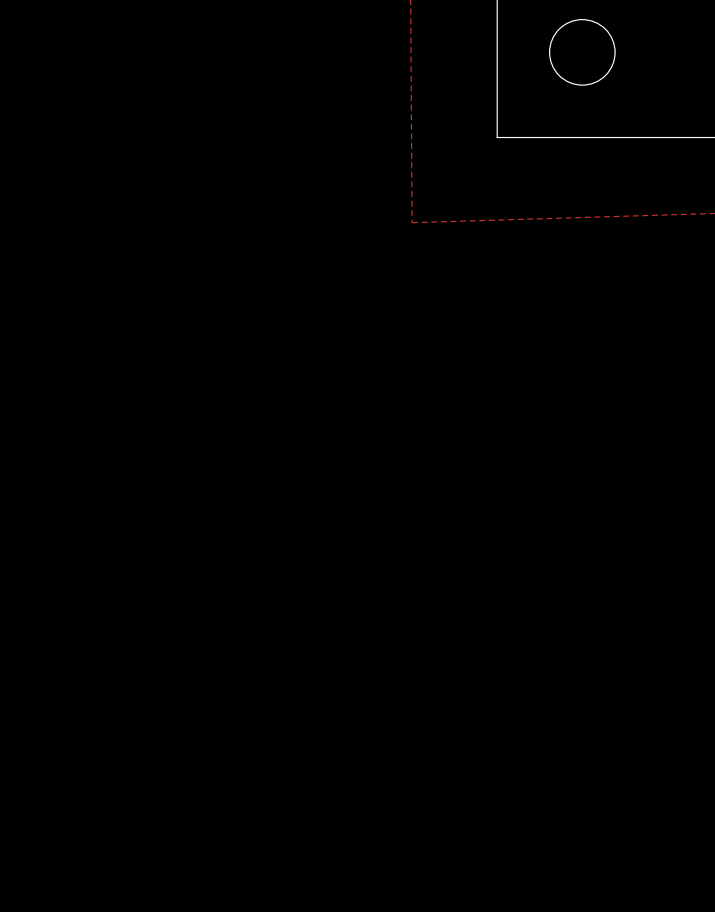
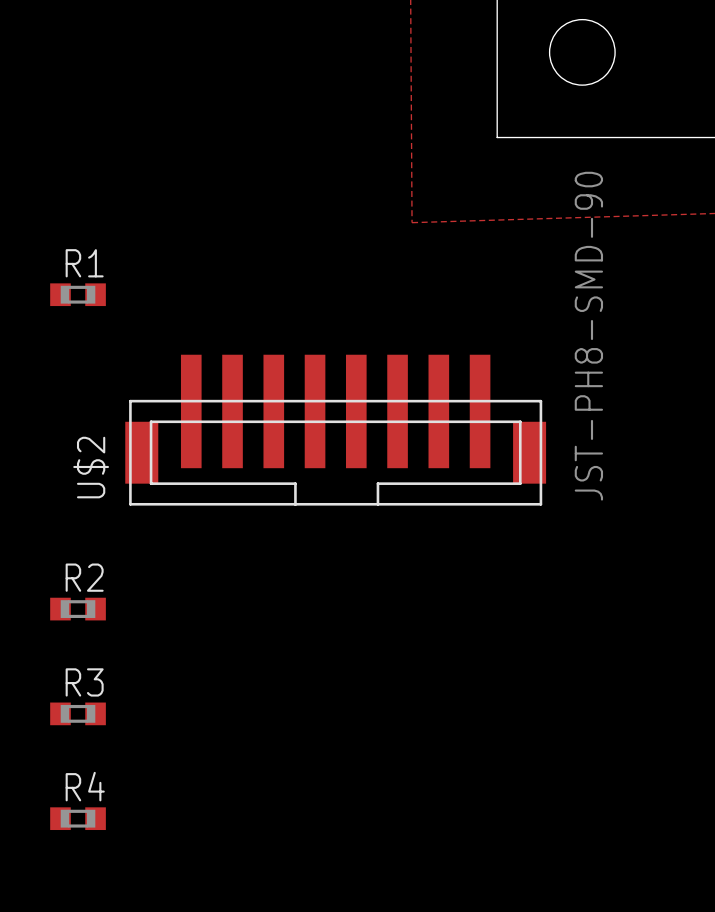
R1: none -> (78, 294)
U$2: none -> JST-PH8-SMD-90 (335, 430)
R2: none -> (78, 609)
R3: none -> (78, 713)
R4: none -> (78, 818)

